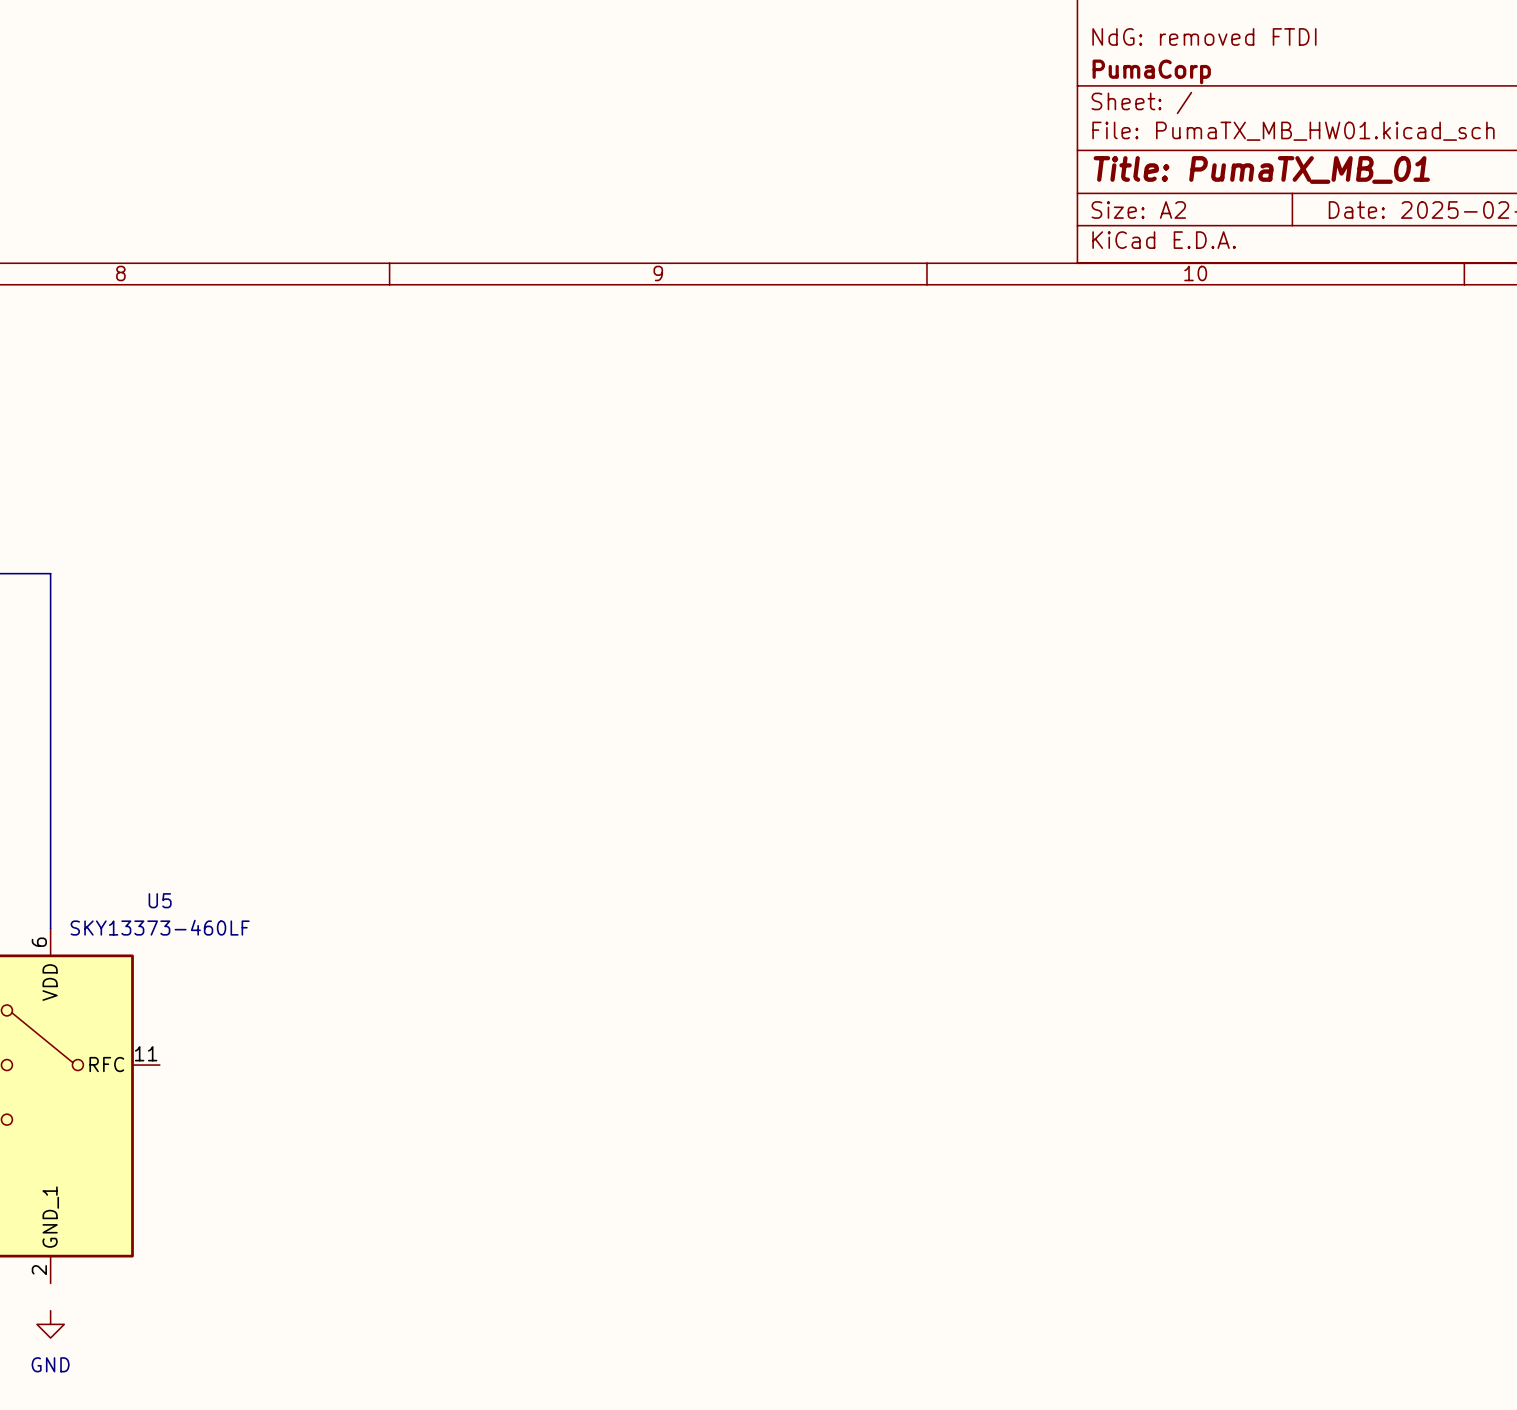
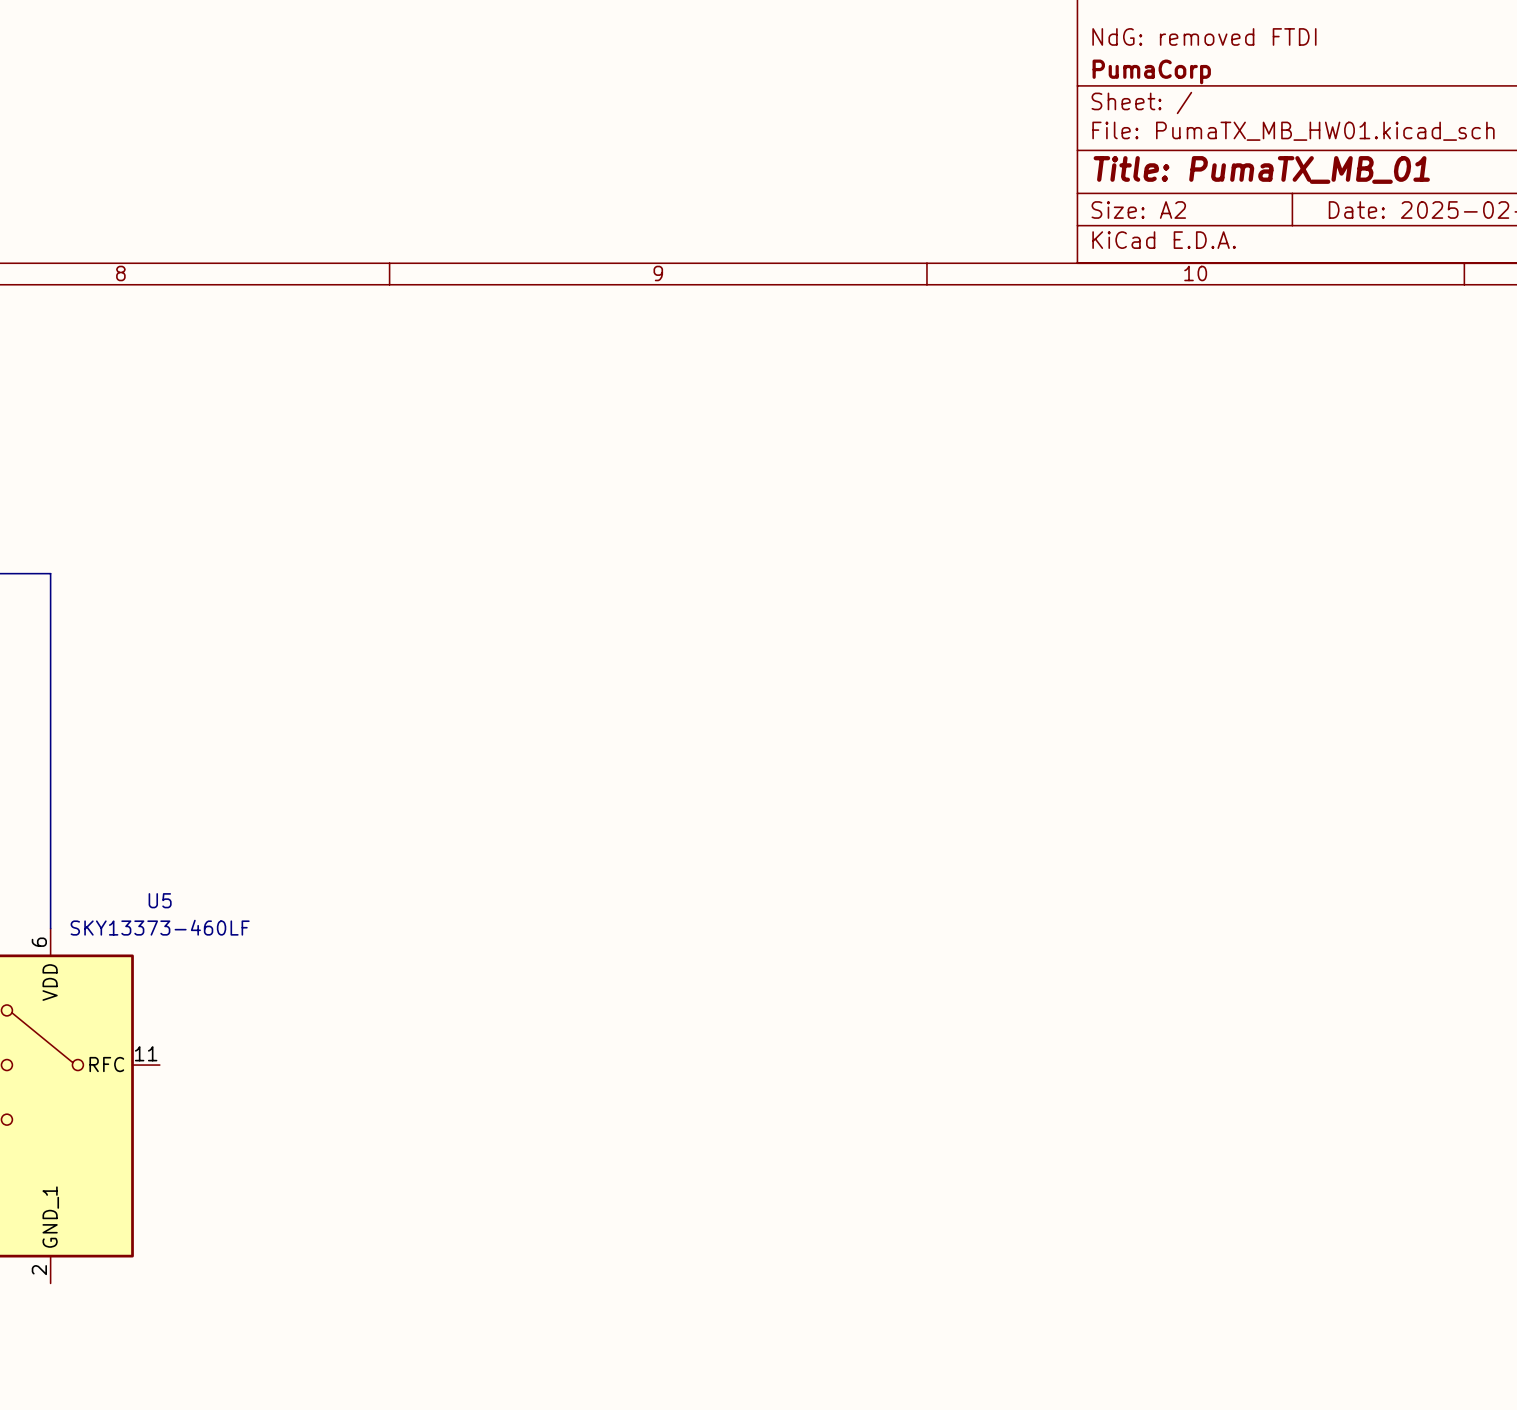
power symbol: GND (50, 1324) -> none

